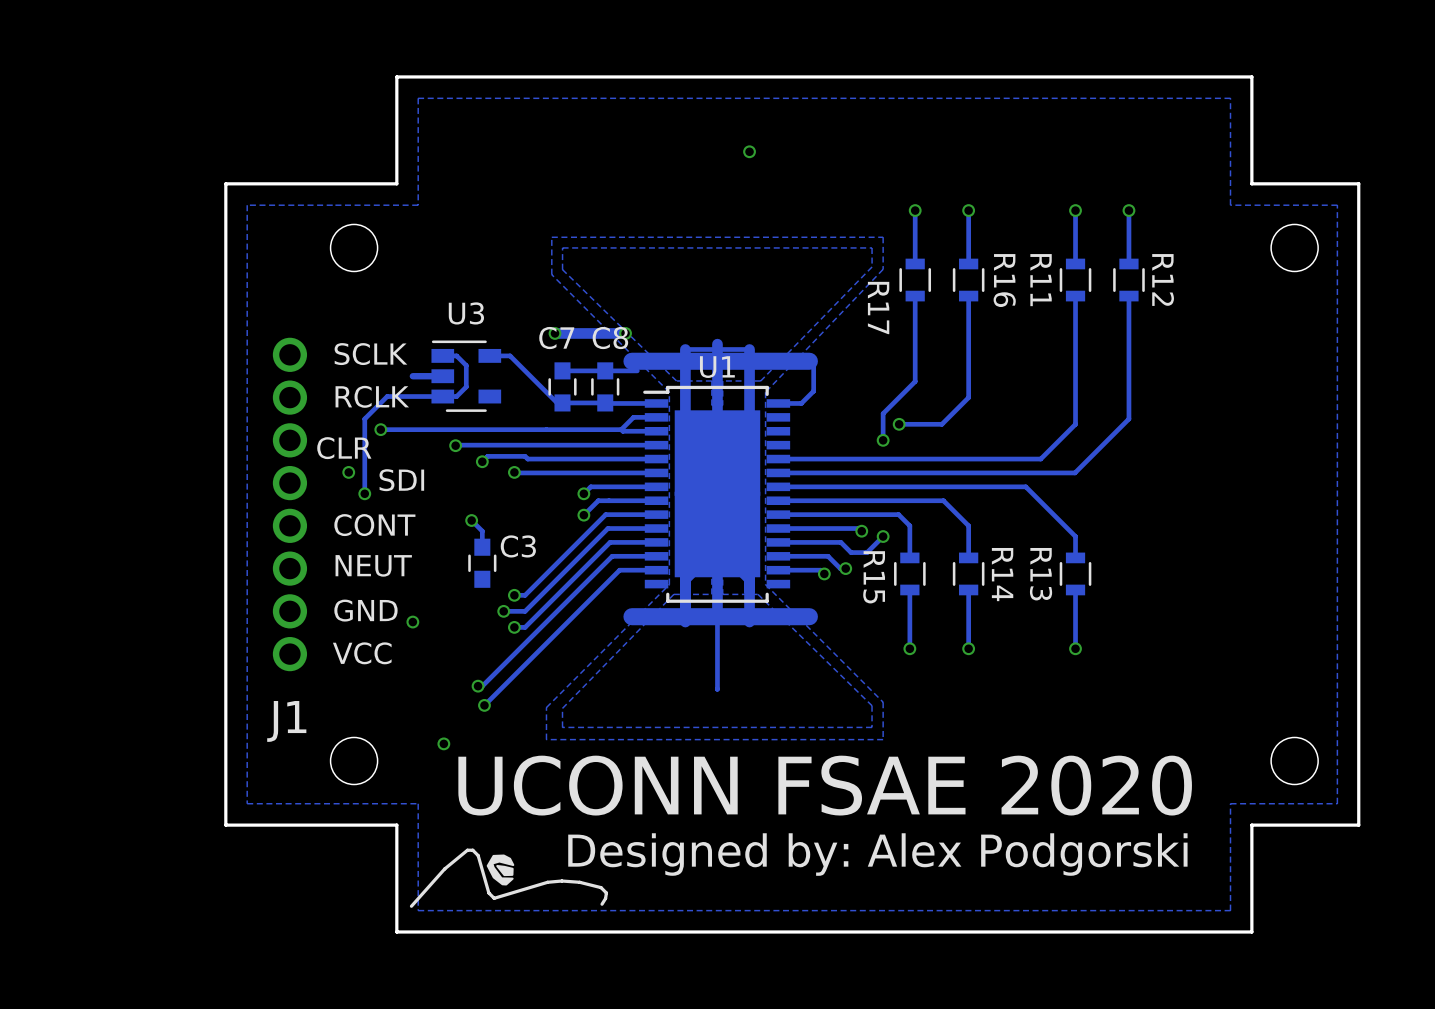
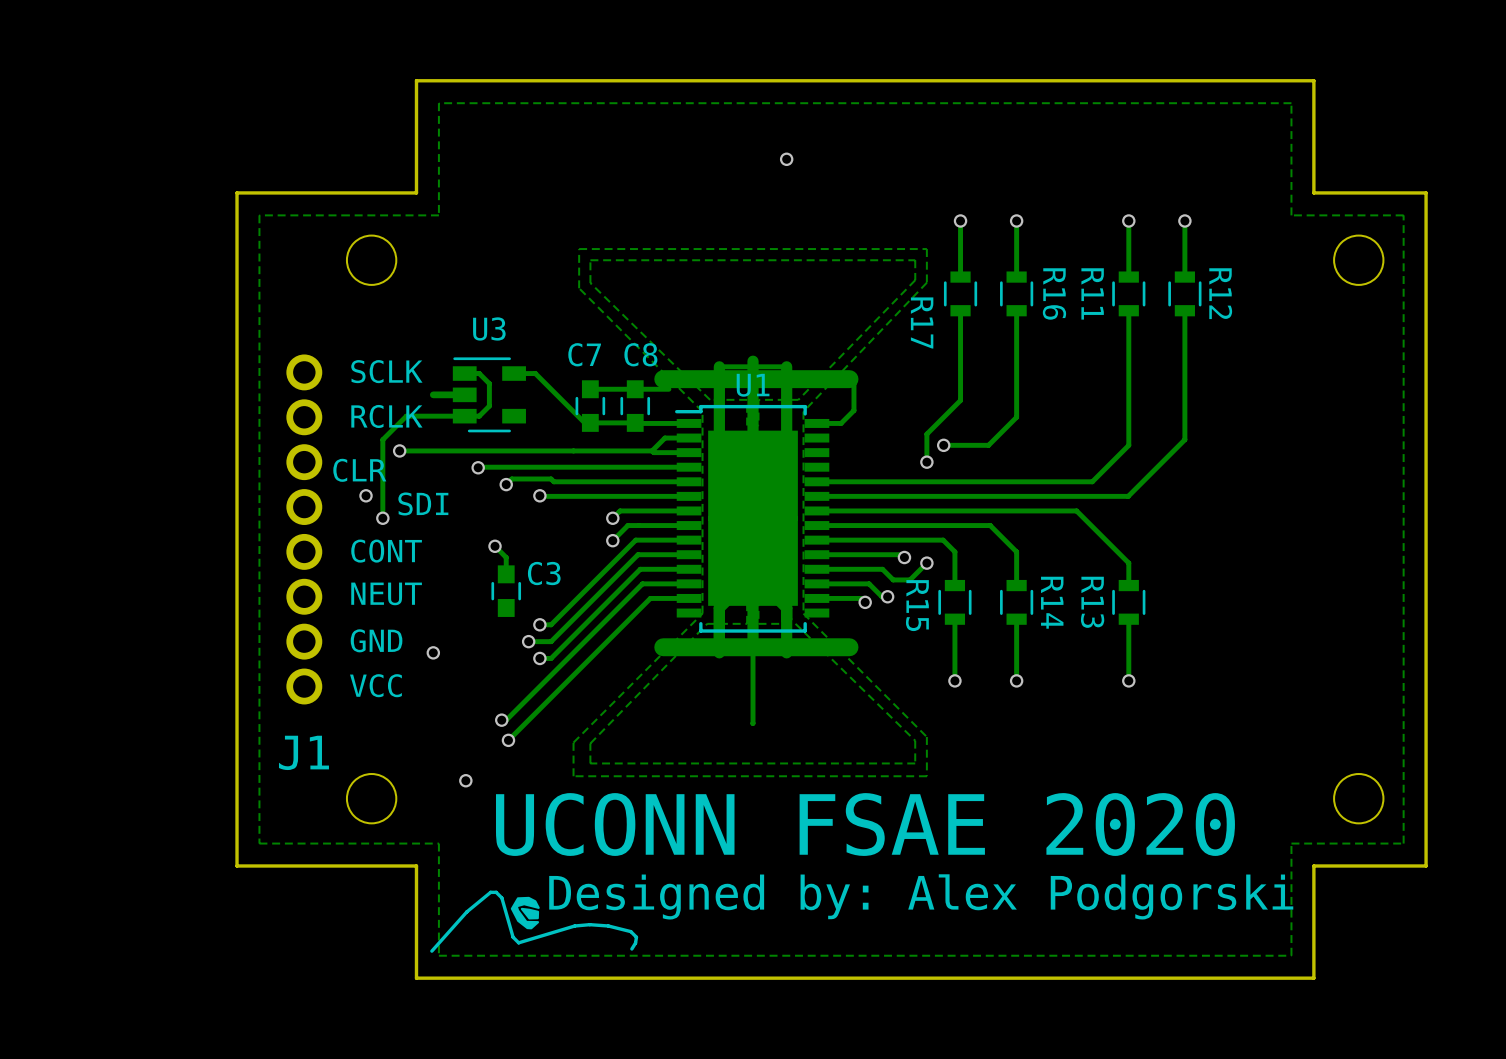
via: (555, 333) -> none
track: (625, 333) (555, 333) -> none
via: (625, 333) -> none

